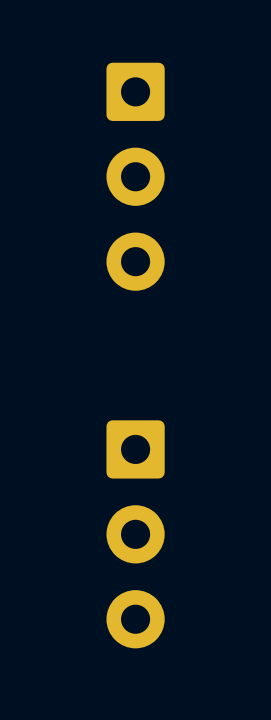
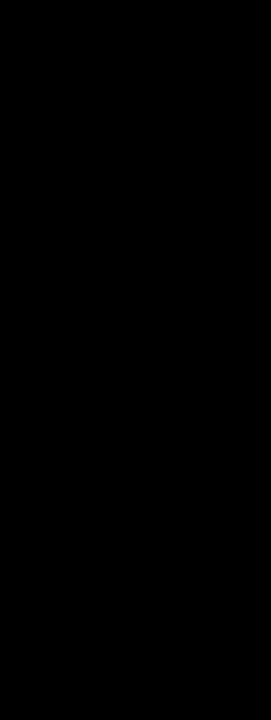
part: (135, 176) -> none
part: (135, 534) -> none

